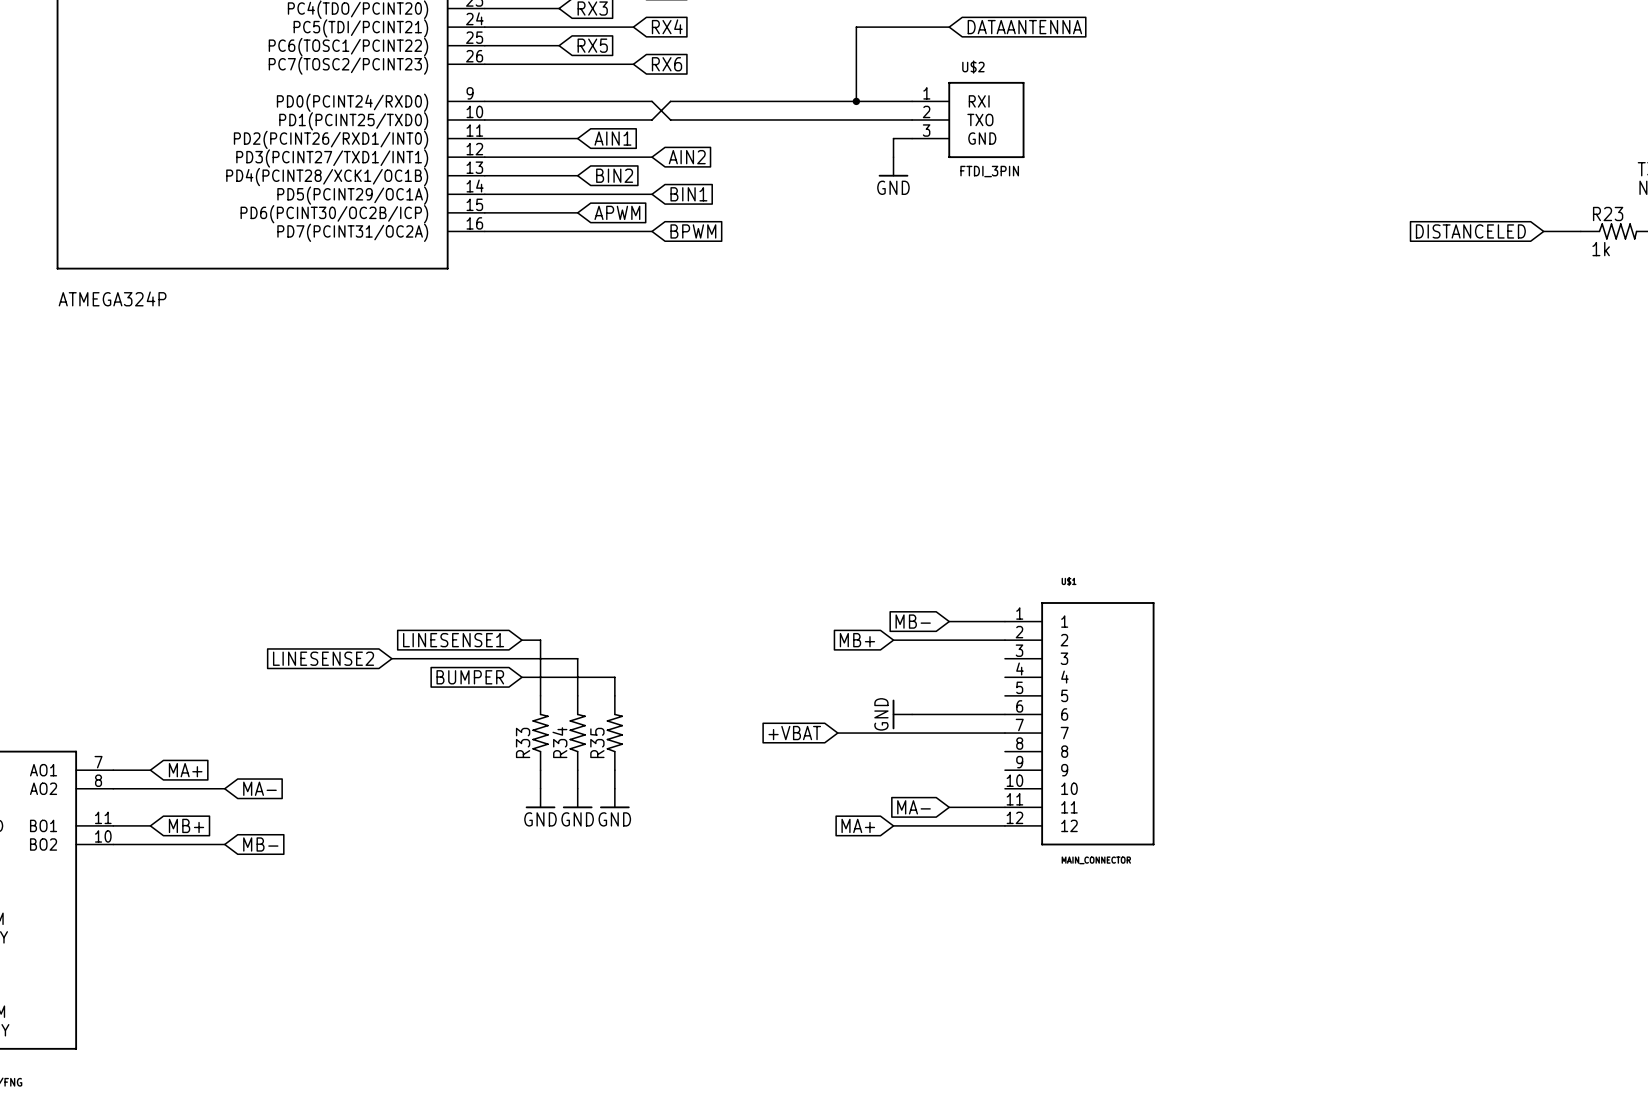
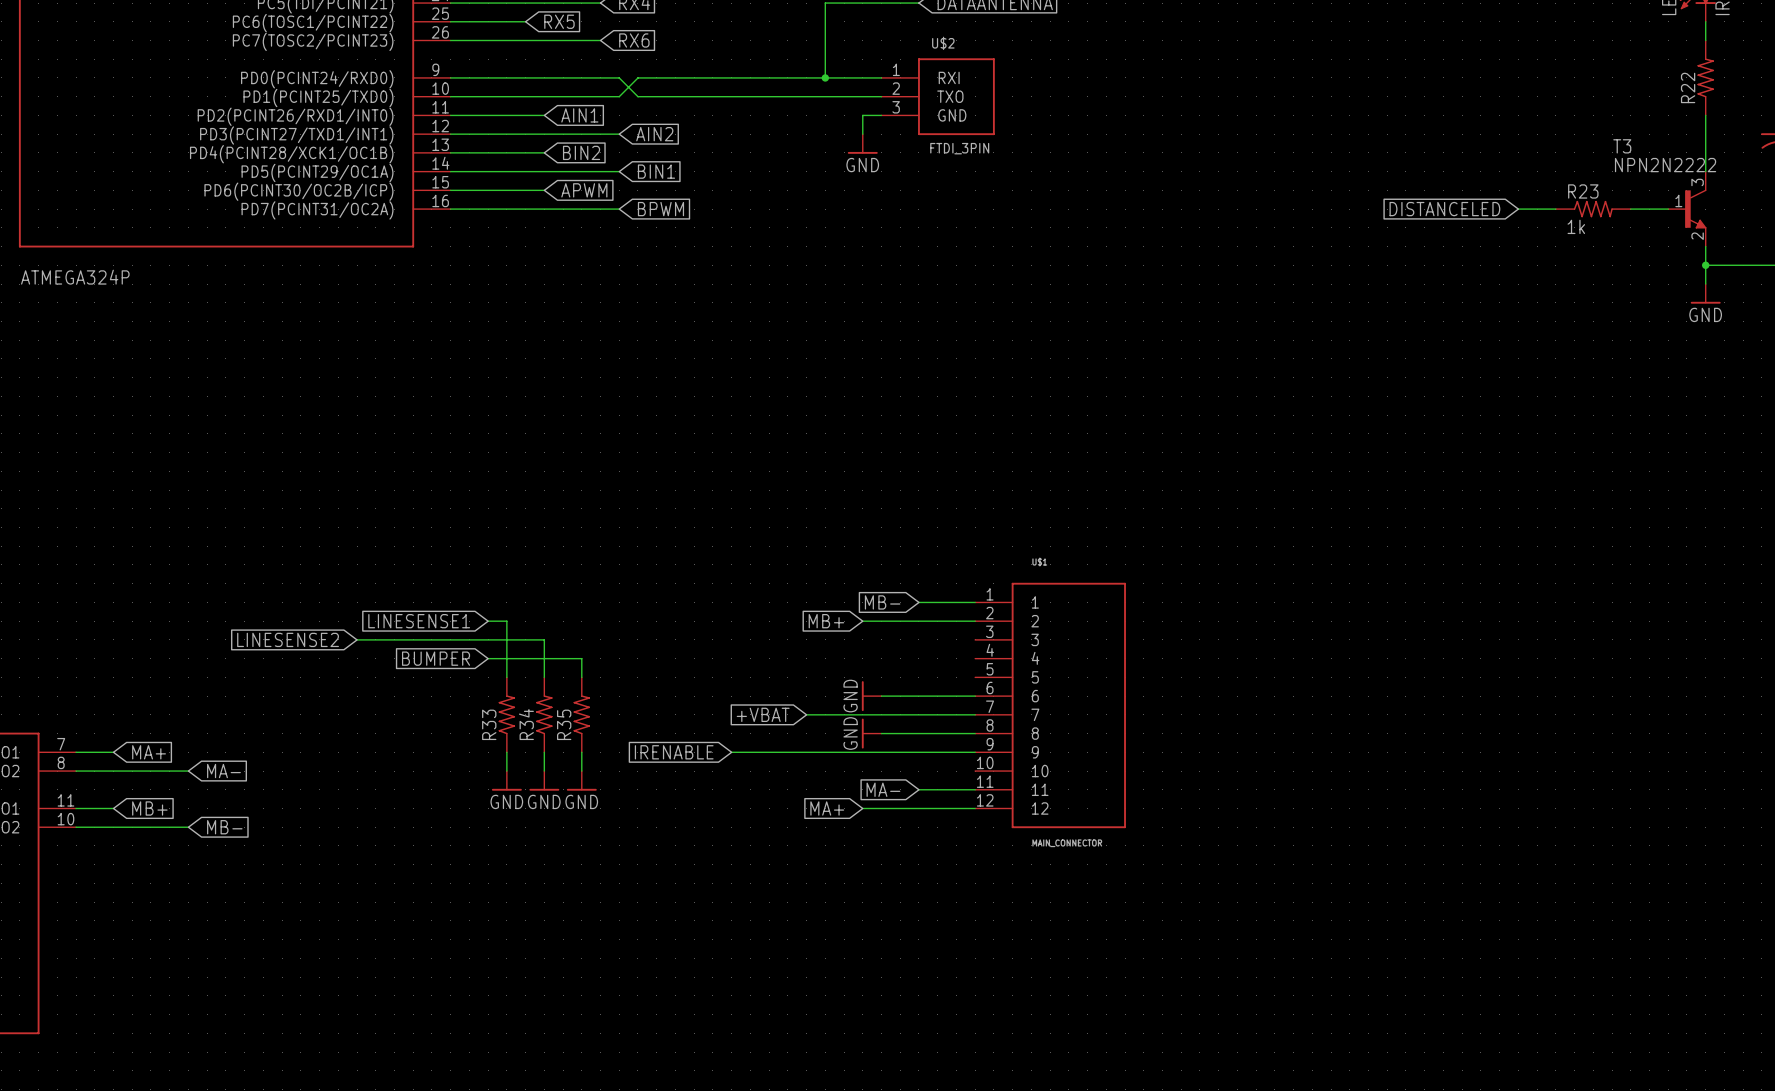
power symbol: none -> GND (871, 733)
wire: none -> (881, 733) (975, 733)
global label: none -> IRENABLE (674, 752)
wire: none -> (731, 752) (975, 752)

